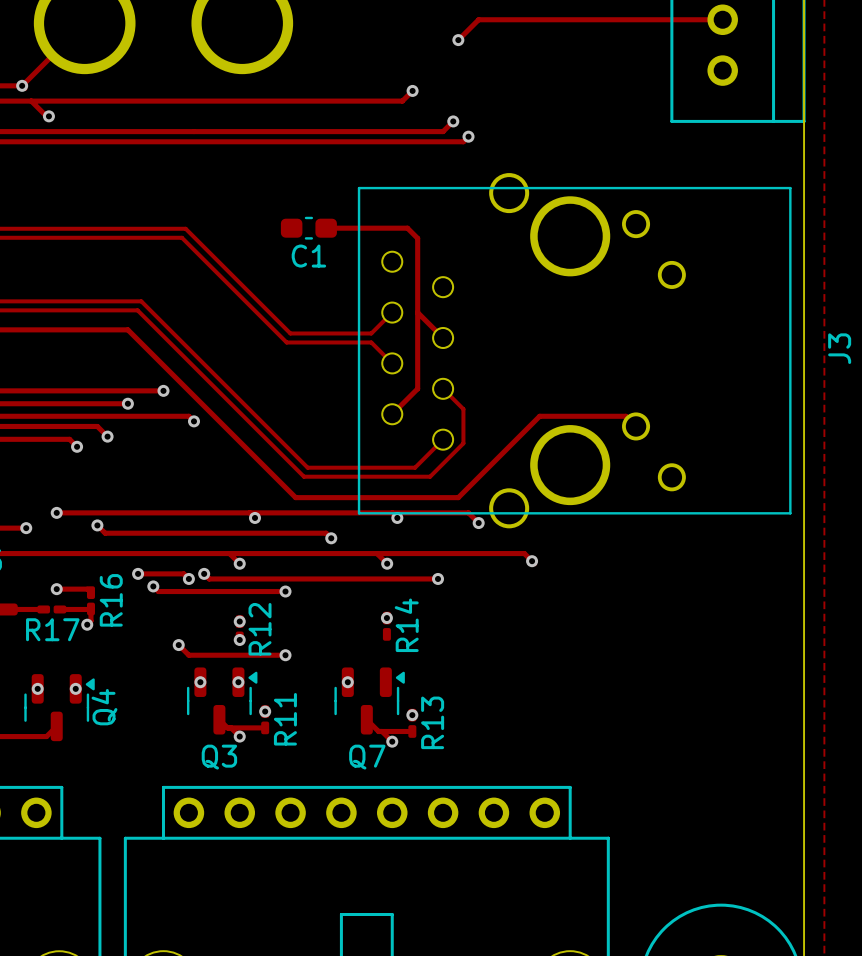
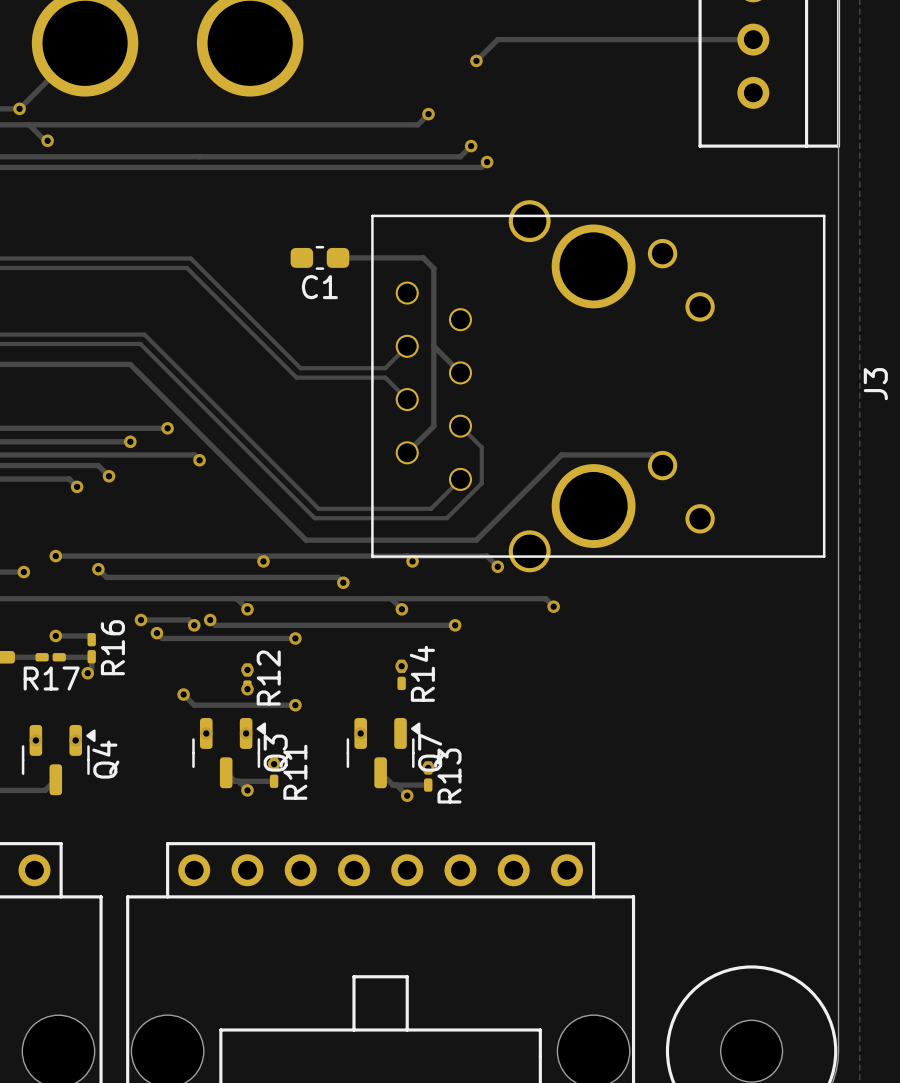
Q3 name rotation: 0° (219, 757) -> 90° counterclockwise (276, 753)
Q3 name position: Q3 (219, 757) -> Q3 (276, 753)
Q7 name rotation: 0° (367, 757) -> 90° counterclockwise (431, 752)
Q7 name position: Q7 (367, 757) -> Q7 (431, 752)

